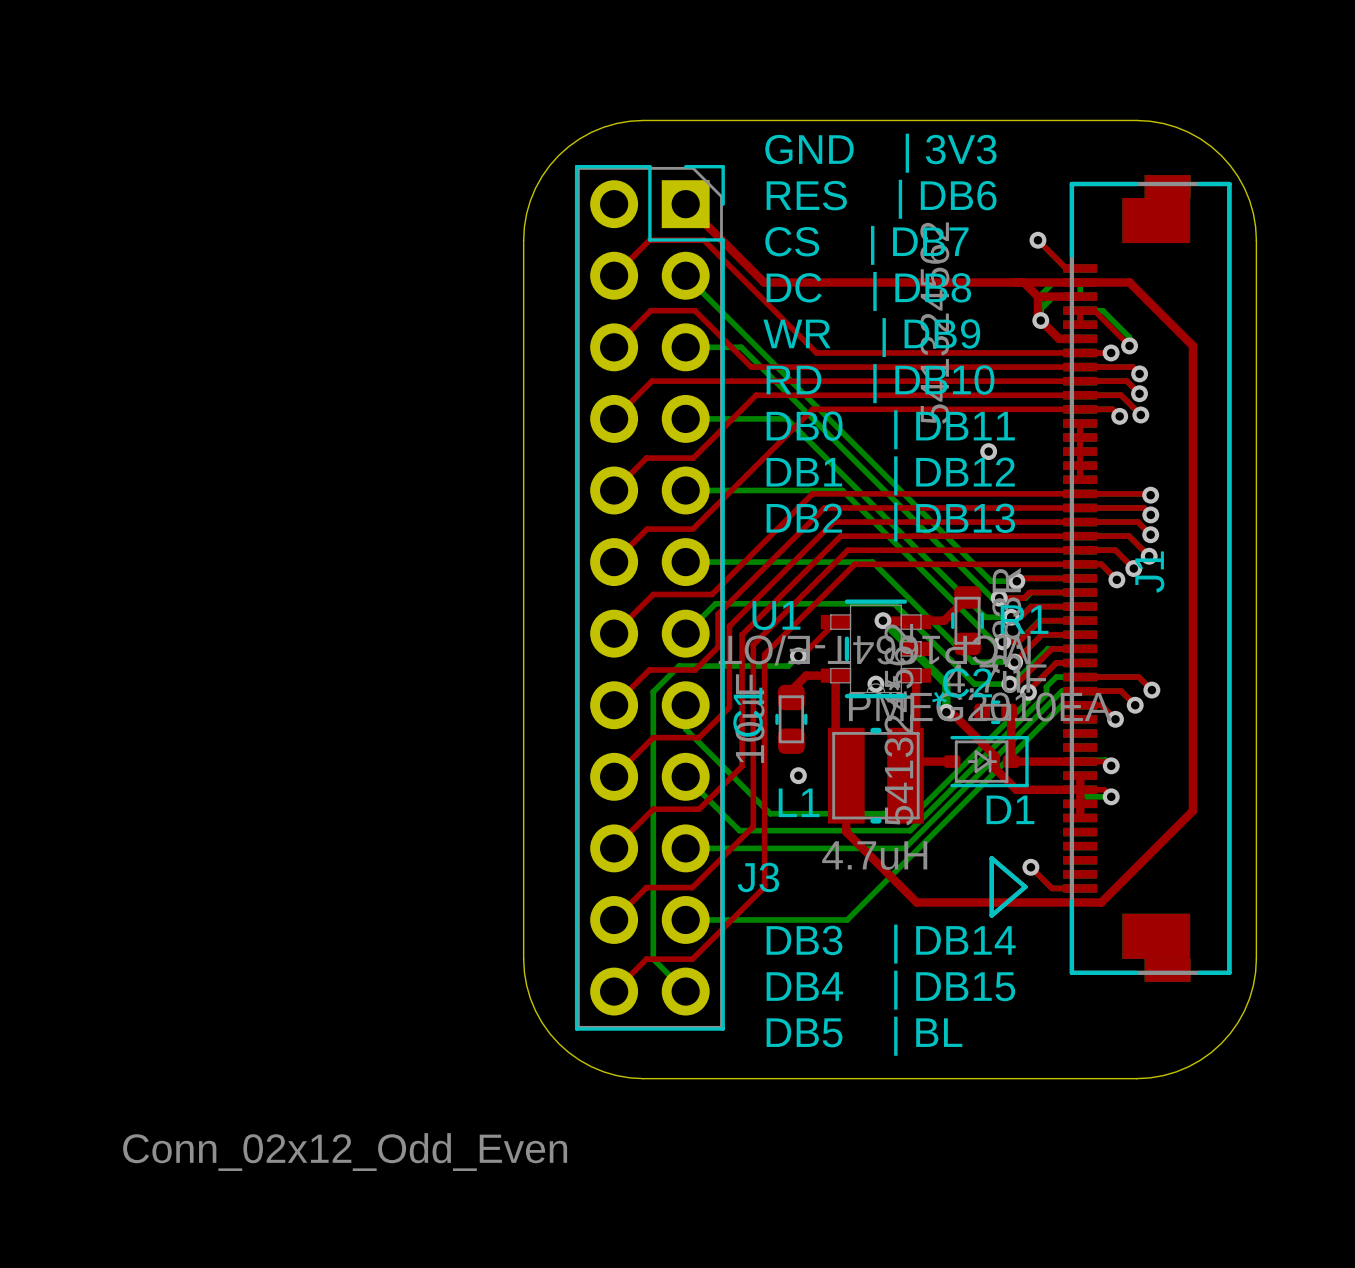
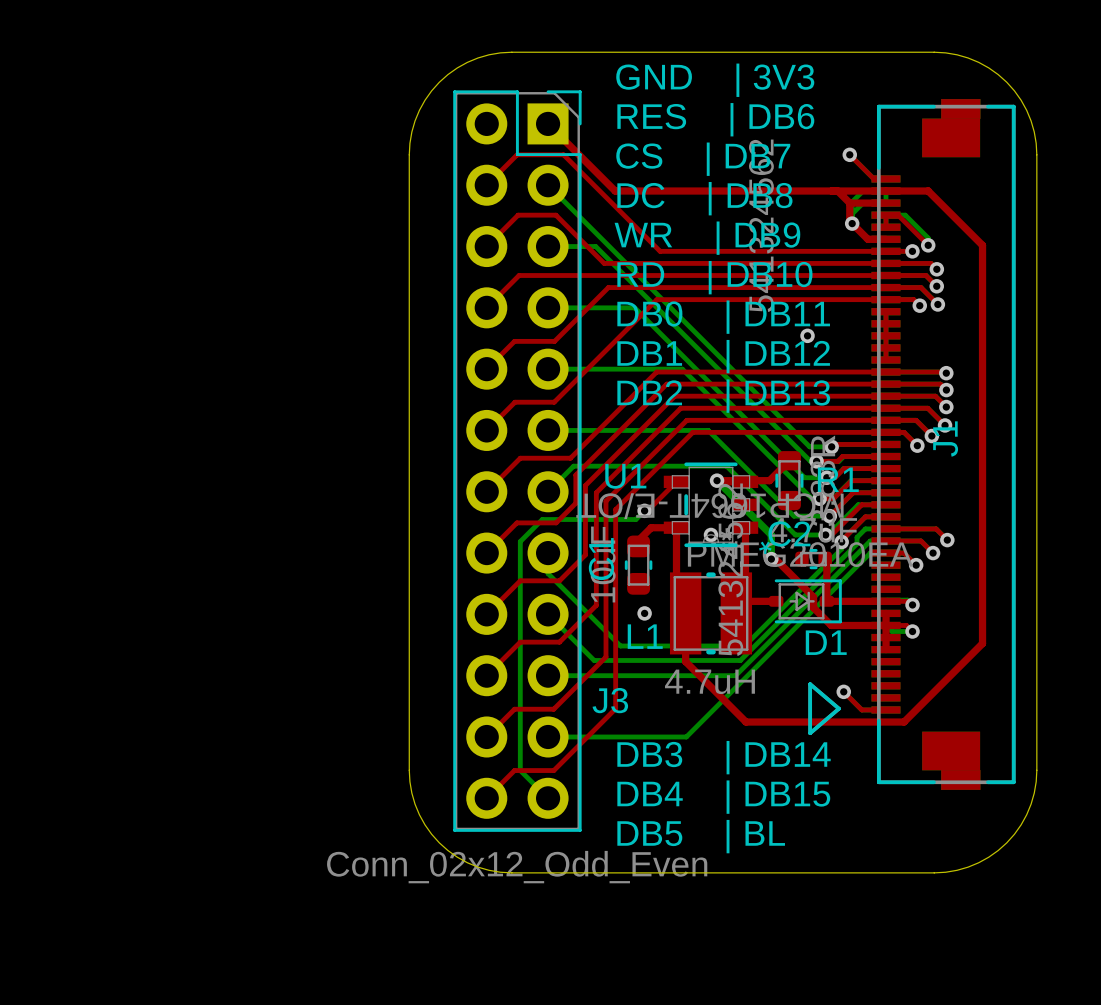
J3 value position: Conn_02x12_Odd_Even (345, 1152) -> Conn_02x12_Odd_Even (517, 867)

